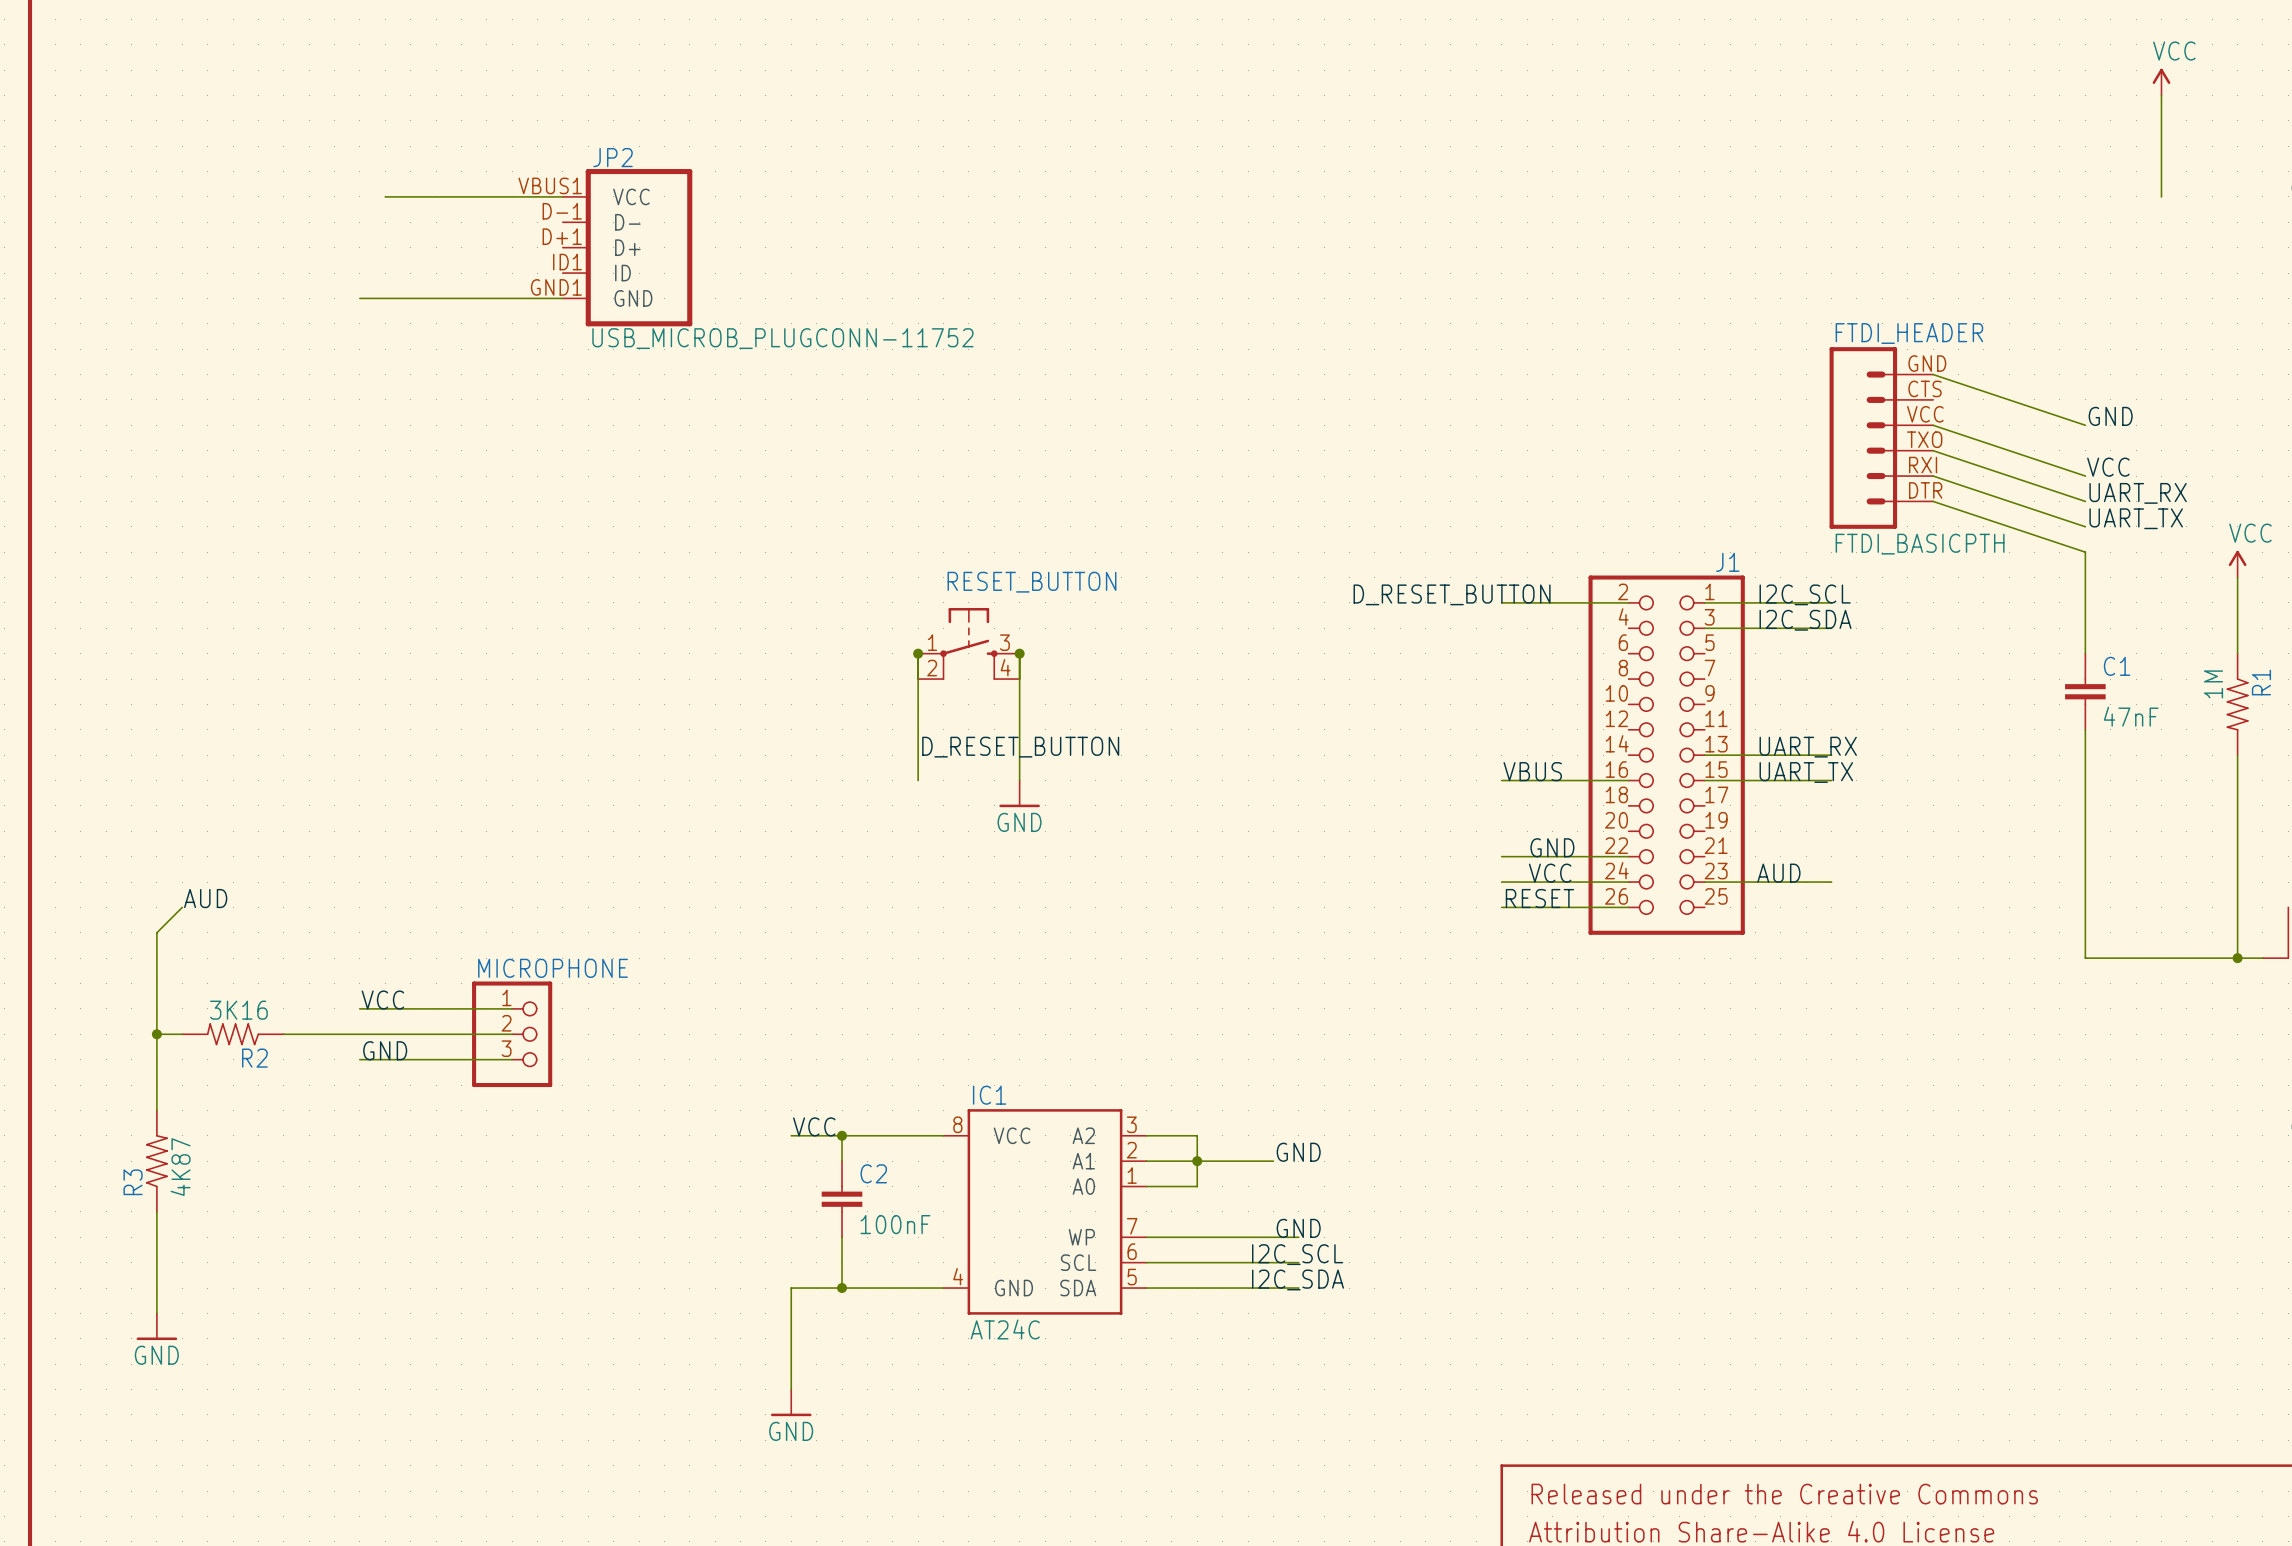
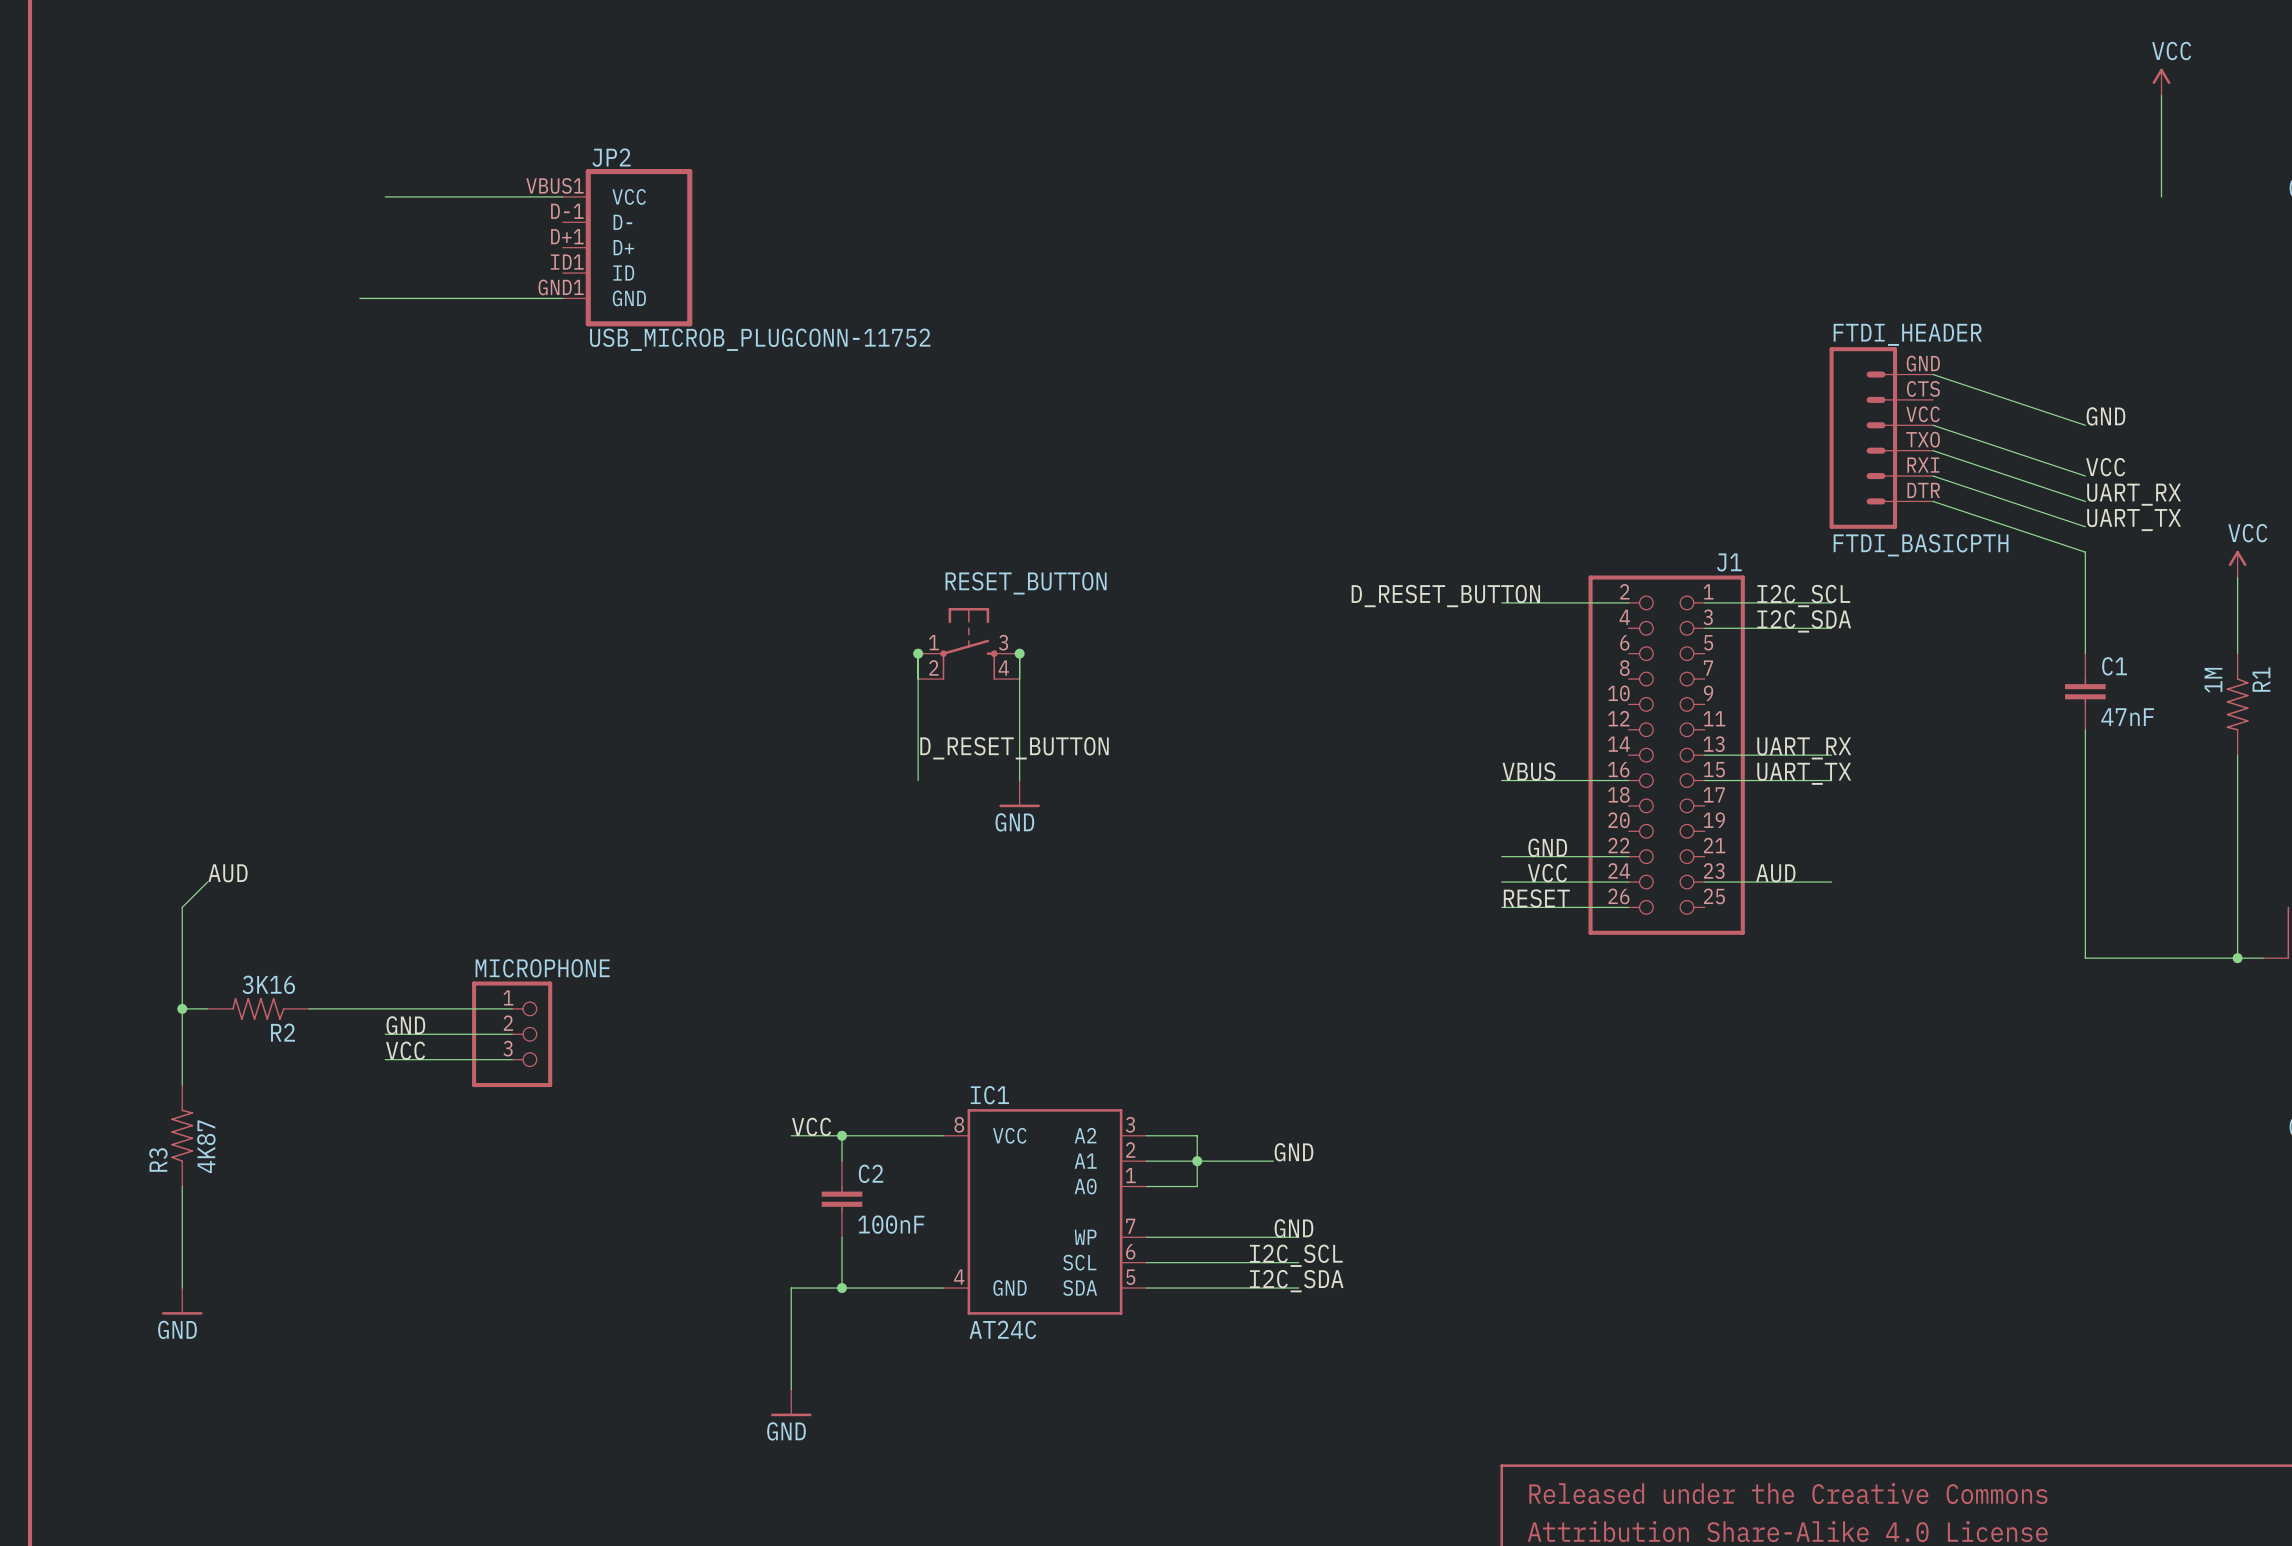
label position: AUD (205, 898) -> AUD (227, 873)
wire: (182, 907) (156, 932) (156, 1110) -> (207, 882) (182, 907) (182, 1085)
label position: VCC (382, 1000) -> VCC (405, 1050)
wire: none -> (309, 1008) (359, 1008)
wire: (156, 1034) (182, 1034) -> (182, 1008) (207, 1008)
junction position: (156, 1034) -> (182, 1008)
R2 position: (233, 1034) -> (258, 1008)
wire: (283, 1034) (385, 1034) -> none
label position: GND (385, 1050) -> GND (405, 1025)
wire: (359, 1059) (385, 1059) -> none
R3 position: (156, 1161) -> (182, 1135)
wire: (156, 1211) (156, 1313) -> (182, 1186) (182, 1288)
power symbol position: GND (156, 1326) -> GND (182, 1301)

